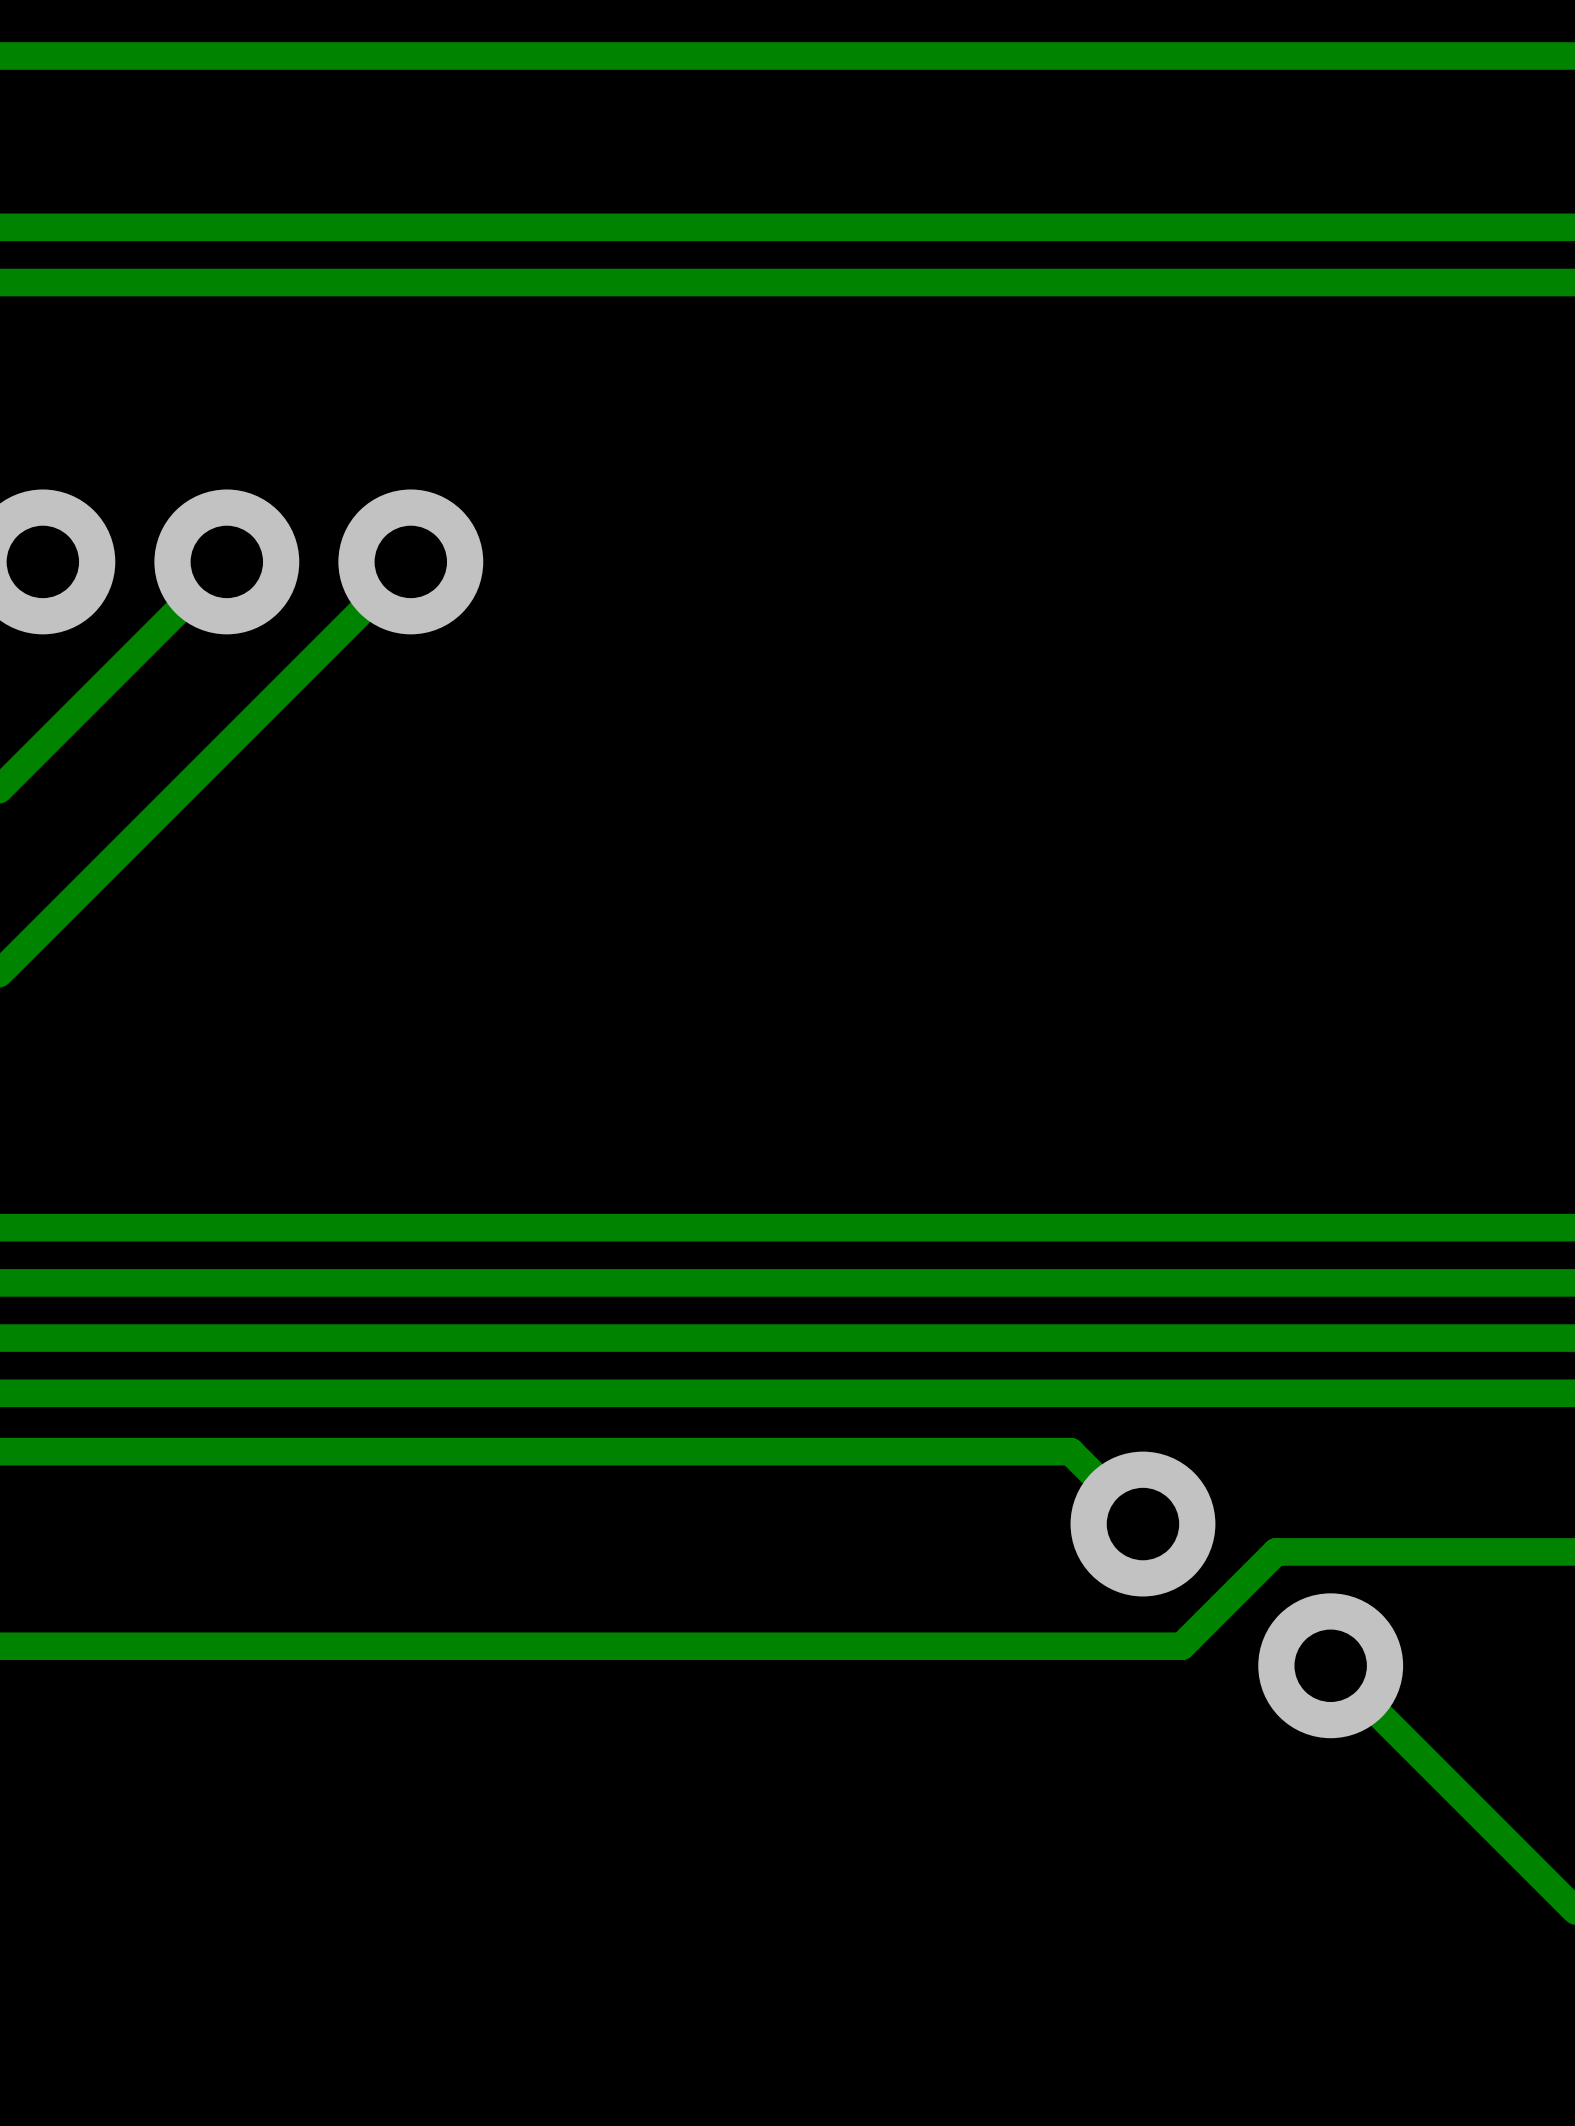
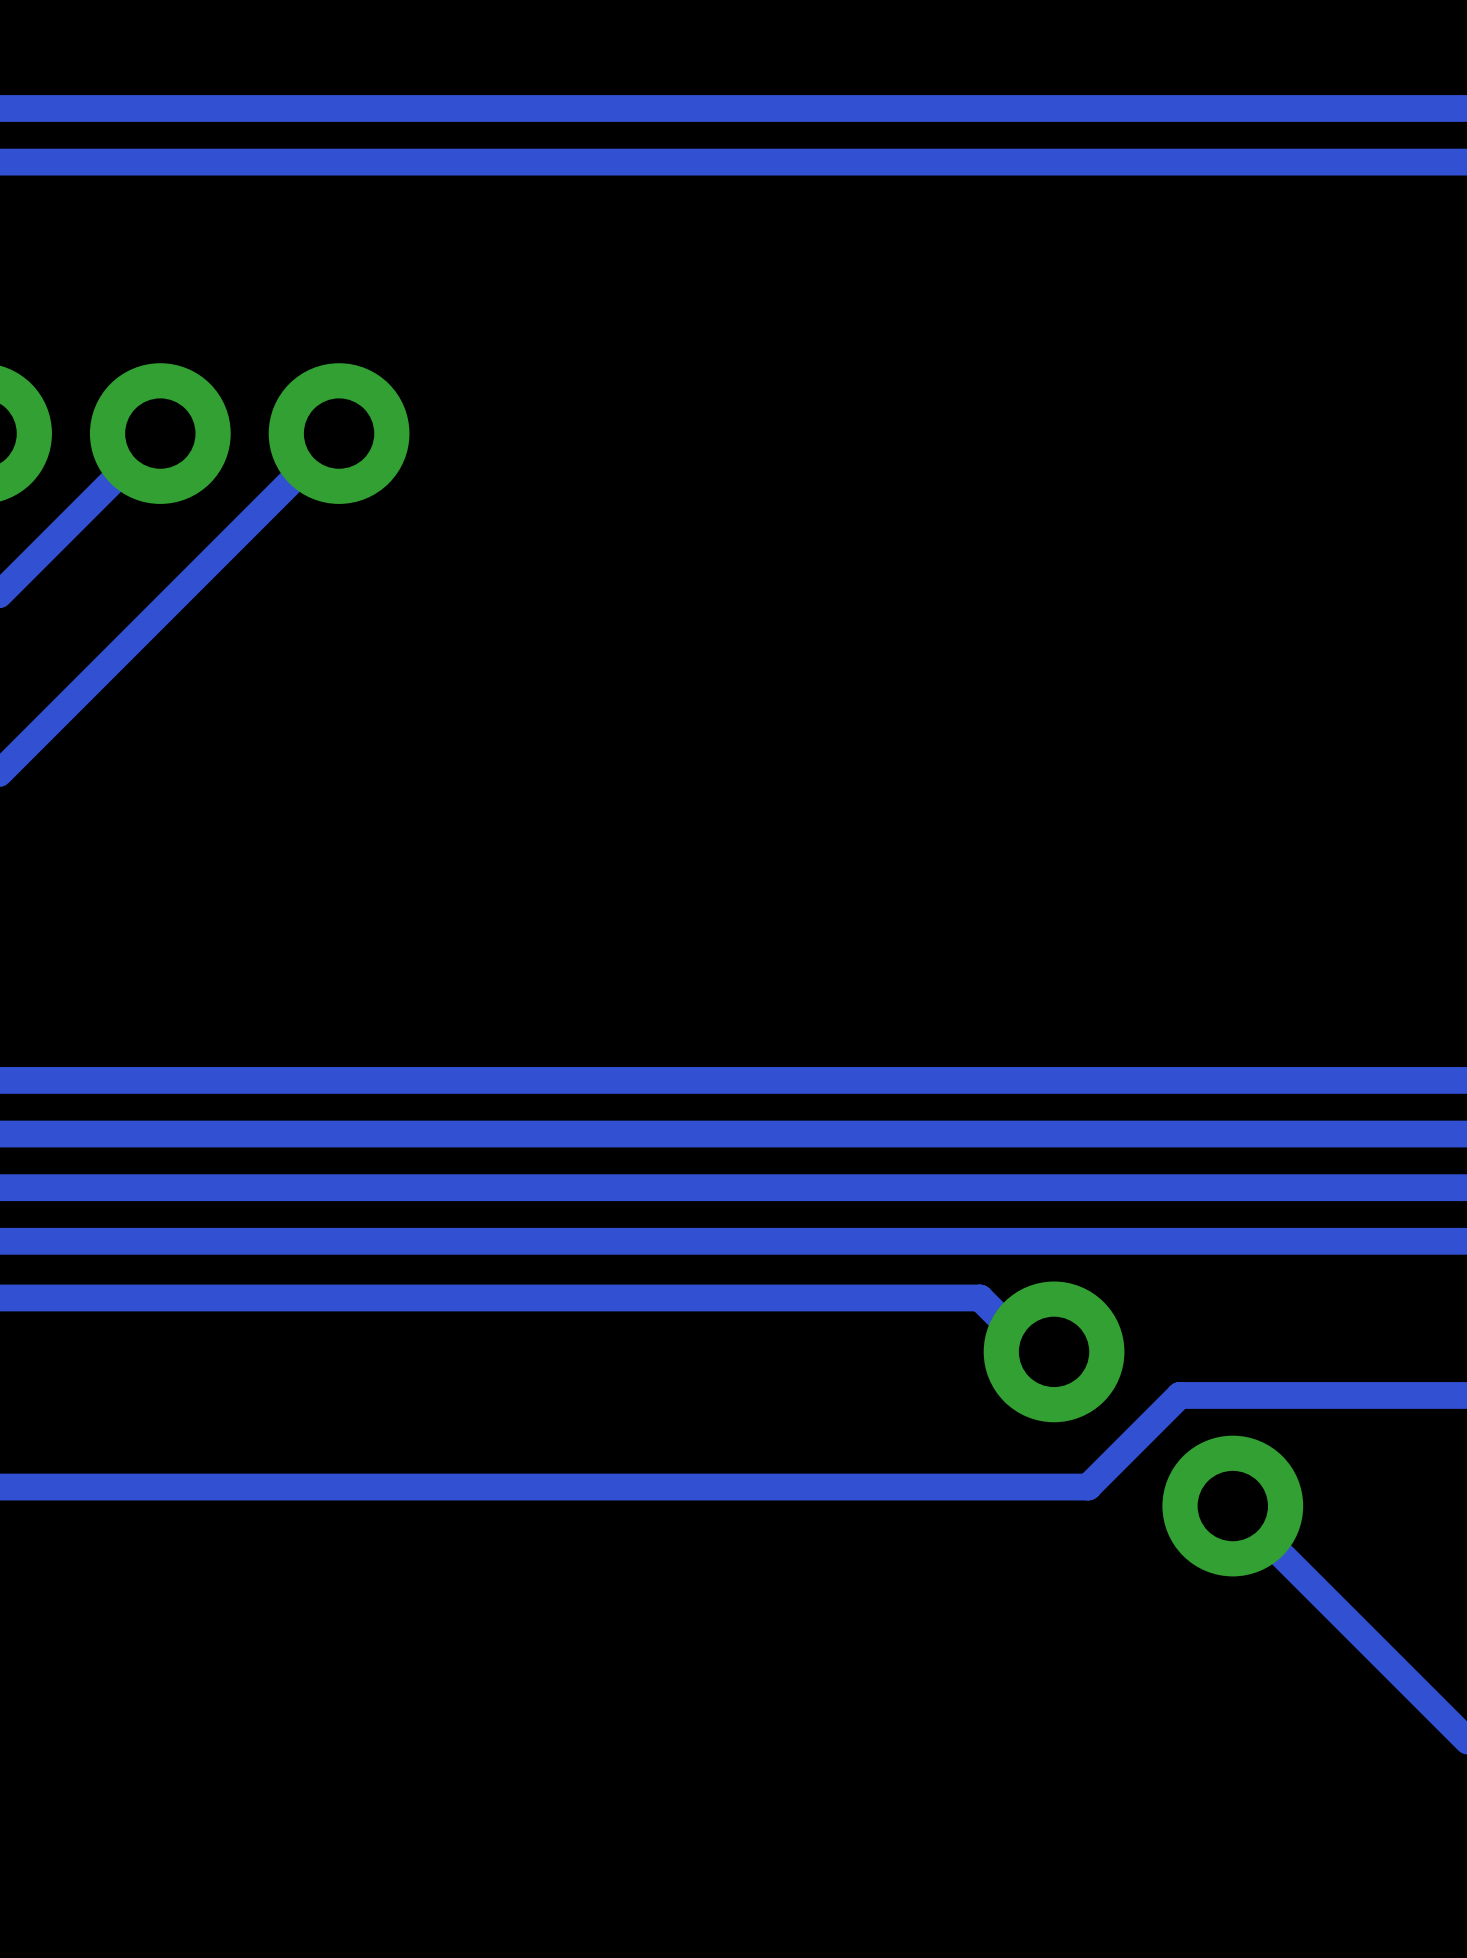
via position: (1142, 1524) -> (1054, 1351)

